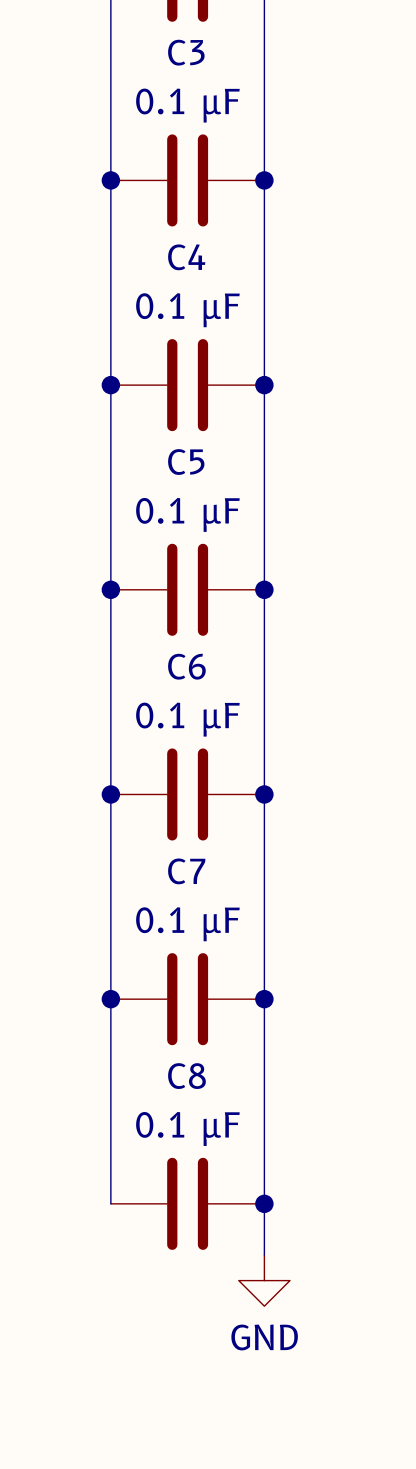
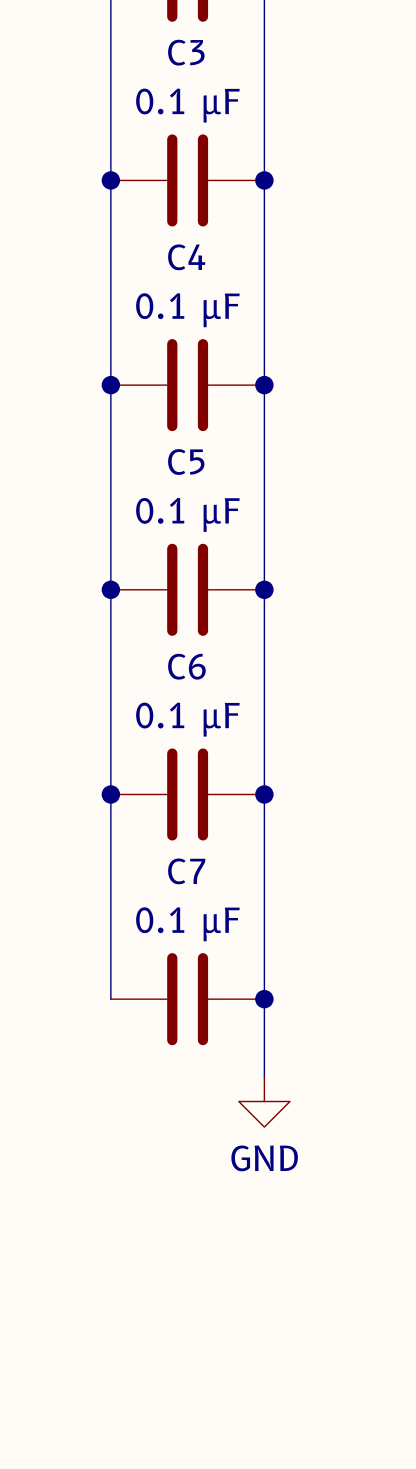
wire: (110, 999) (110, 1203) -> none
junction: (110, 999) -> none
wire: (264, 1075) (264, 1255) -> none
power symbol: none -> GND (264, 1101)
C8: 0.1 µF (187, 1203) -> none
junction: (264, 1203) -> none
power symbol: GND (264, 1280) -> none

